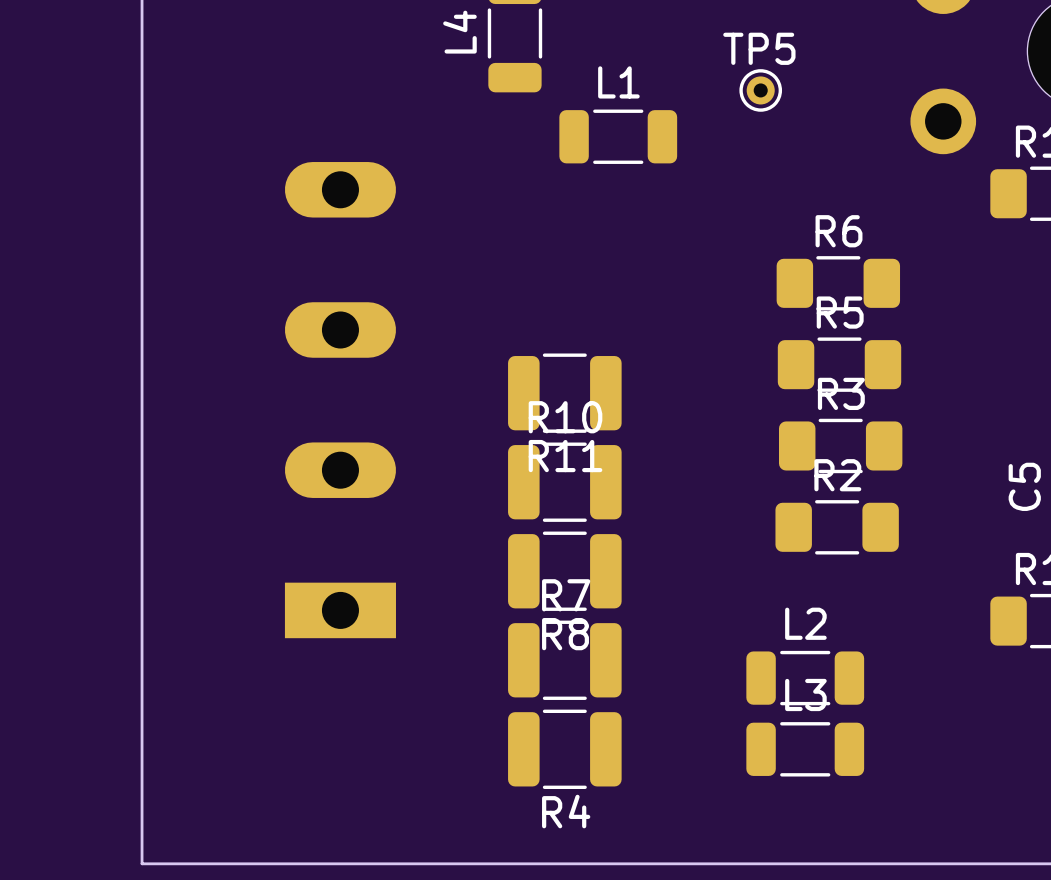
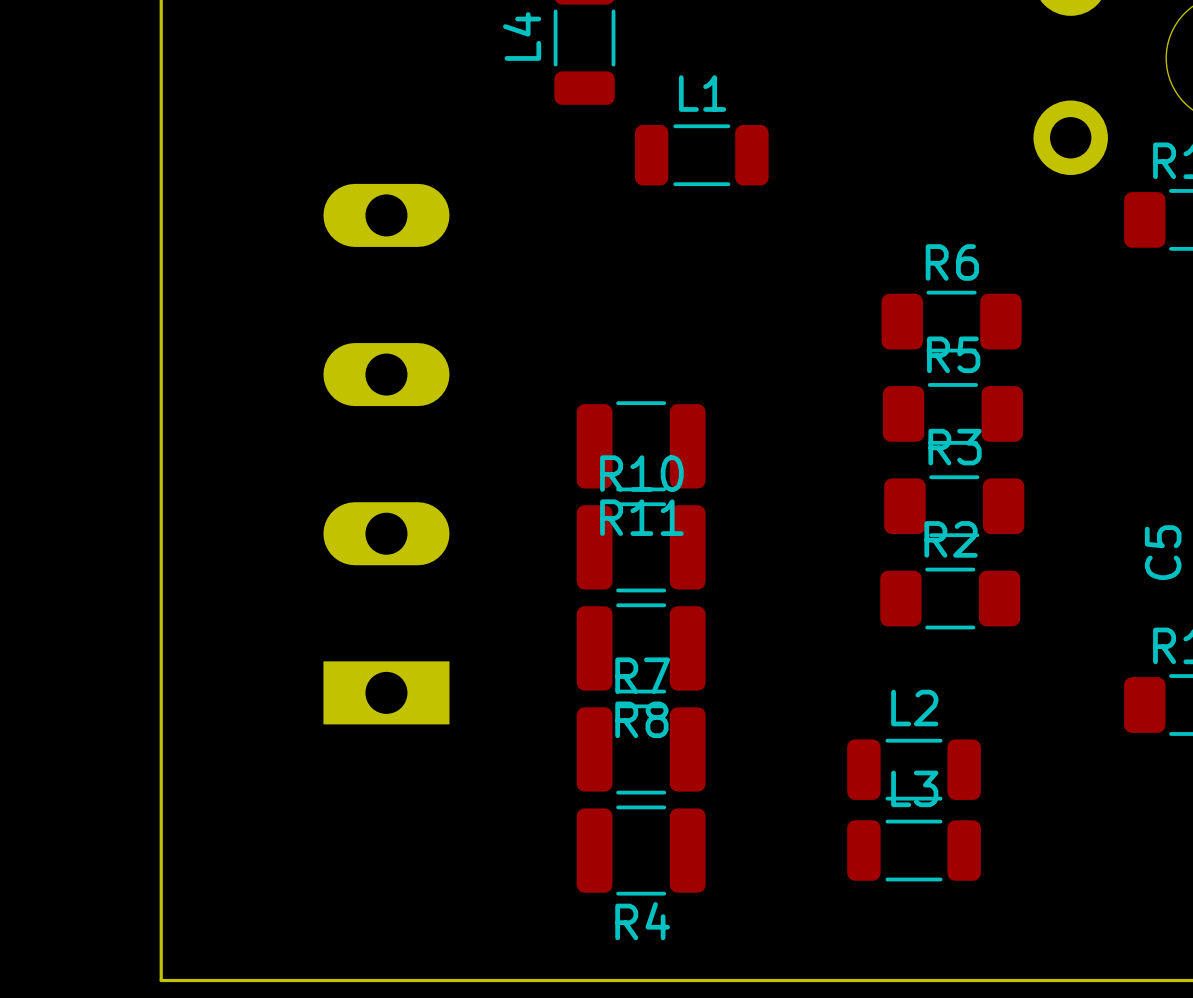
TP5: (760, 90) -> none

